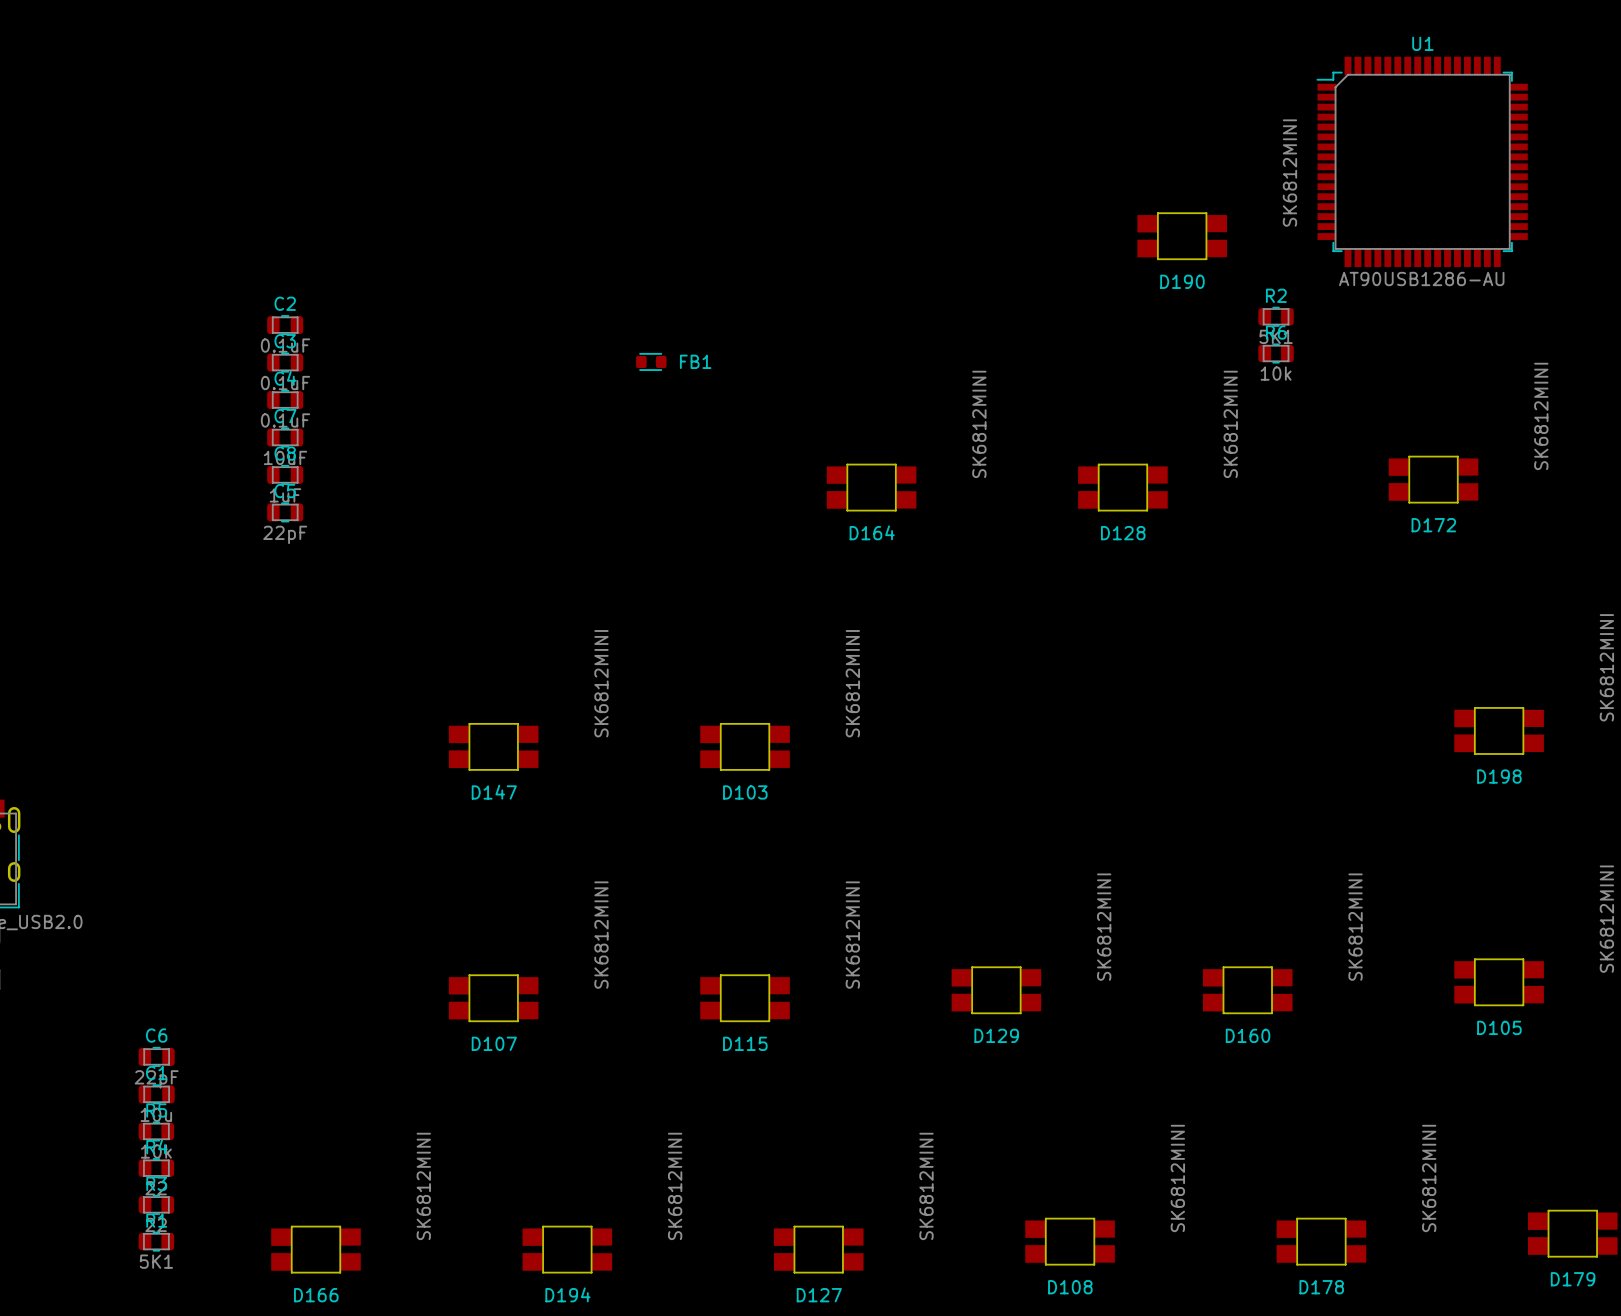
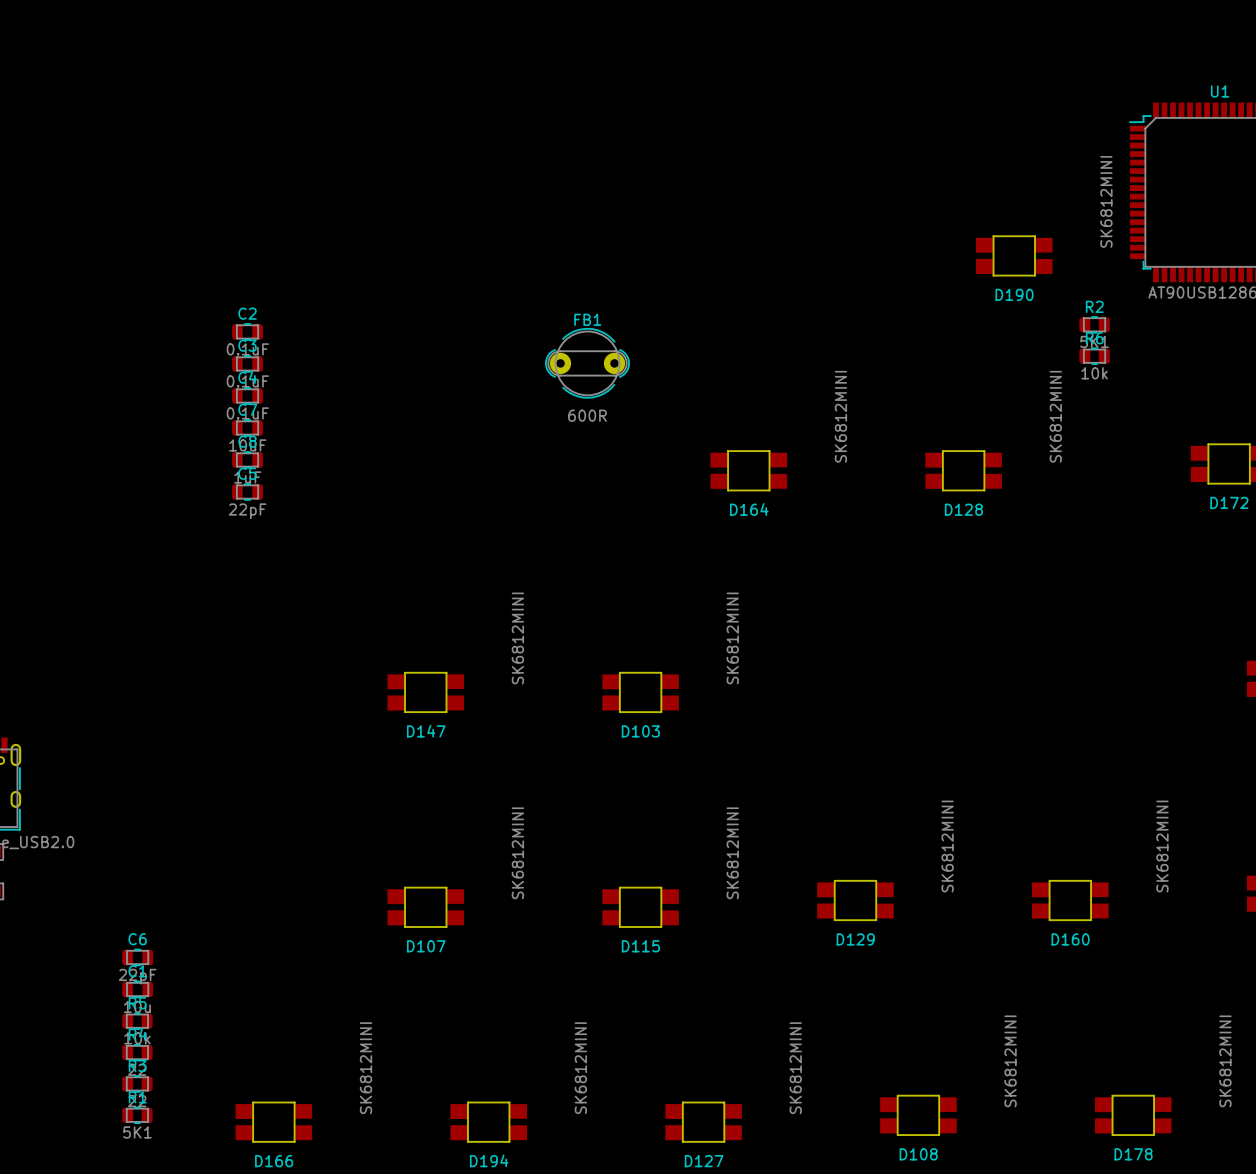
FB1 footprint: [636, 352, 667, 371] -> [545, 328, 630, 399]
FB1 name position: FB1 (695, 361) -> FB1 (587, 319)
FB1 value: none -> 600R (587, 415)

